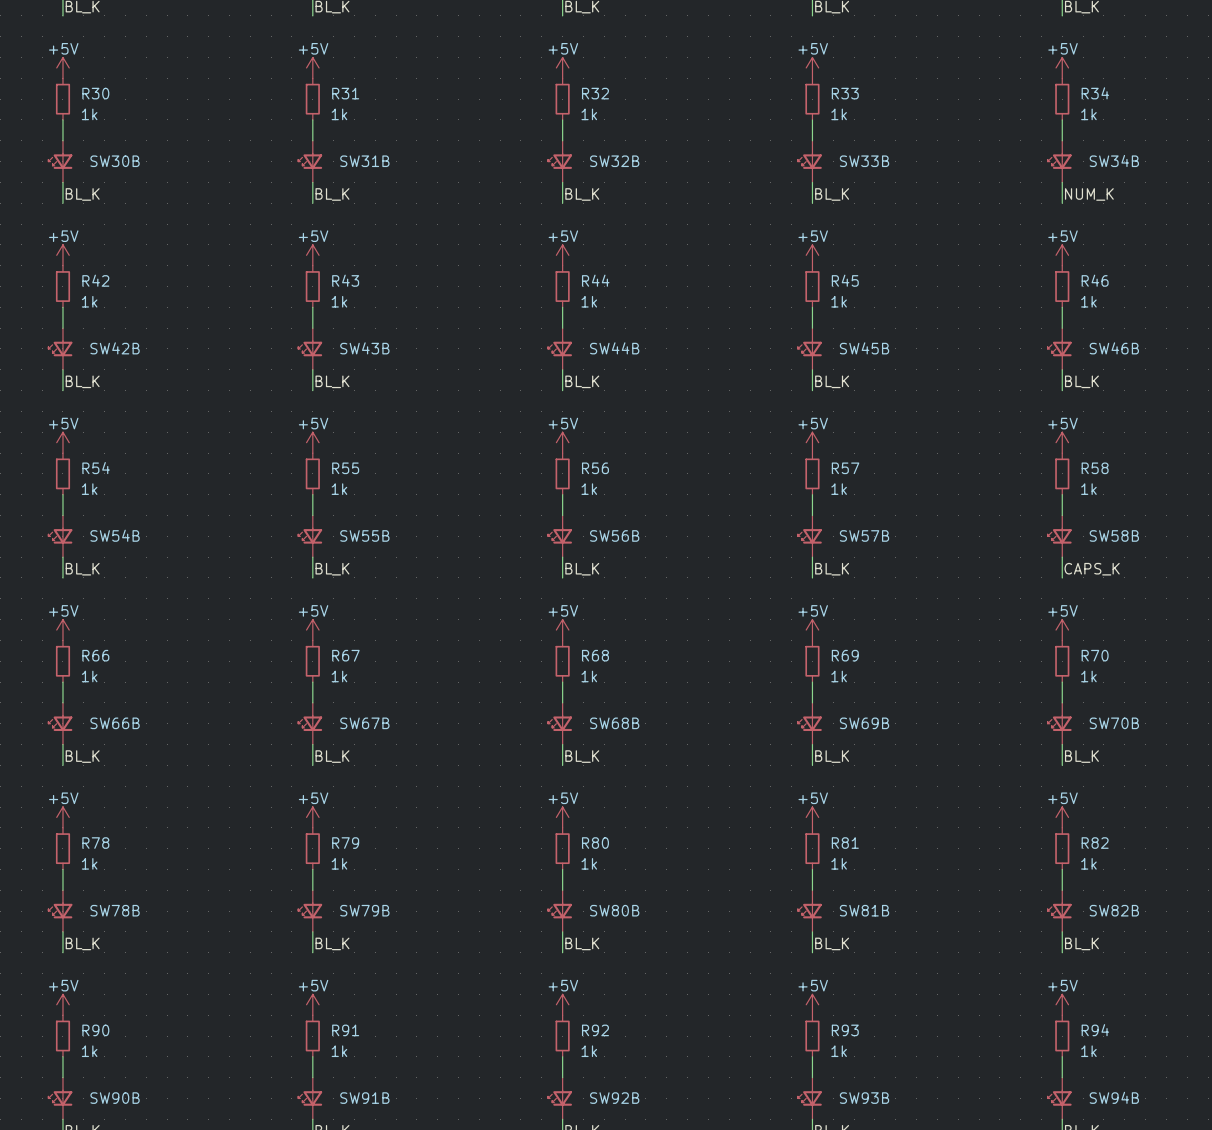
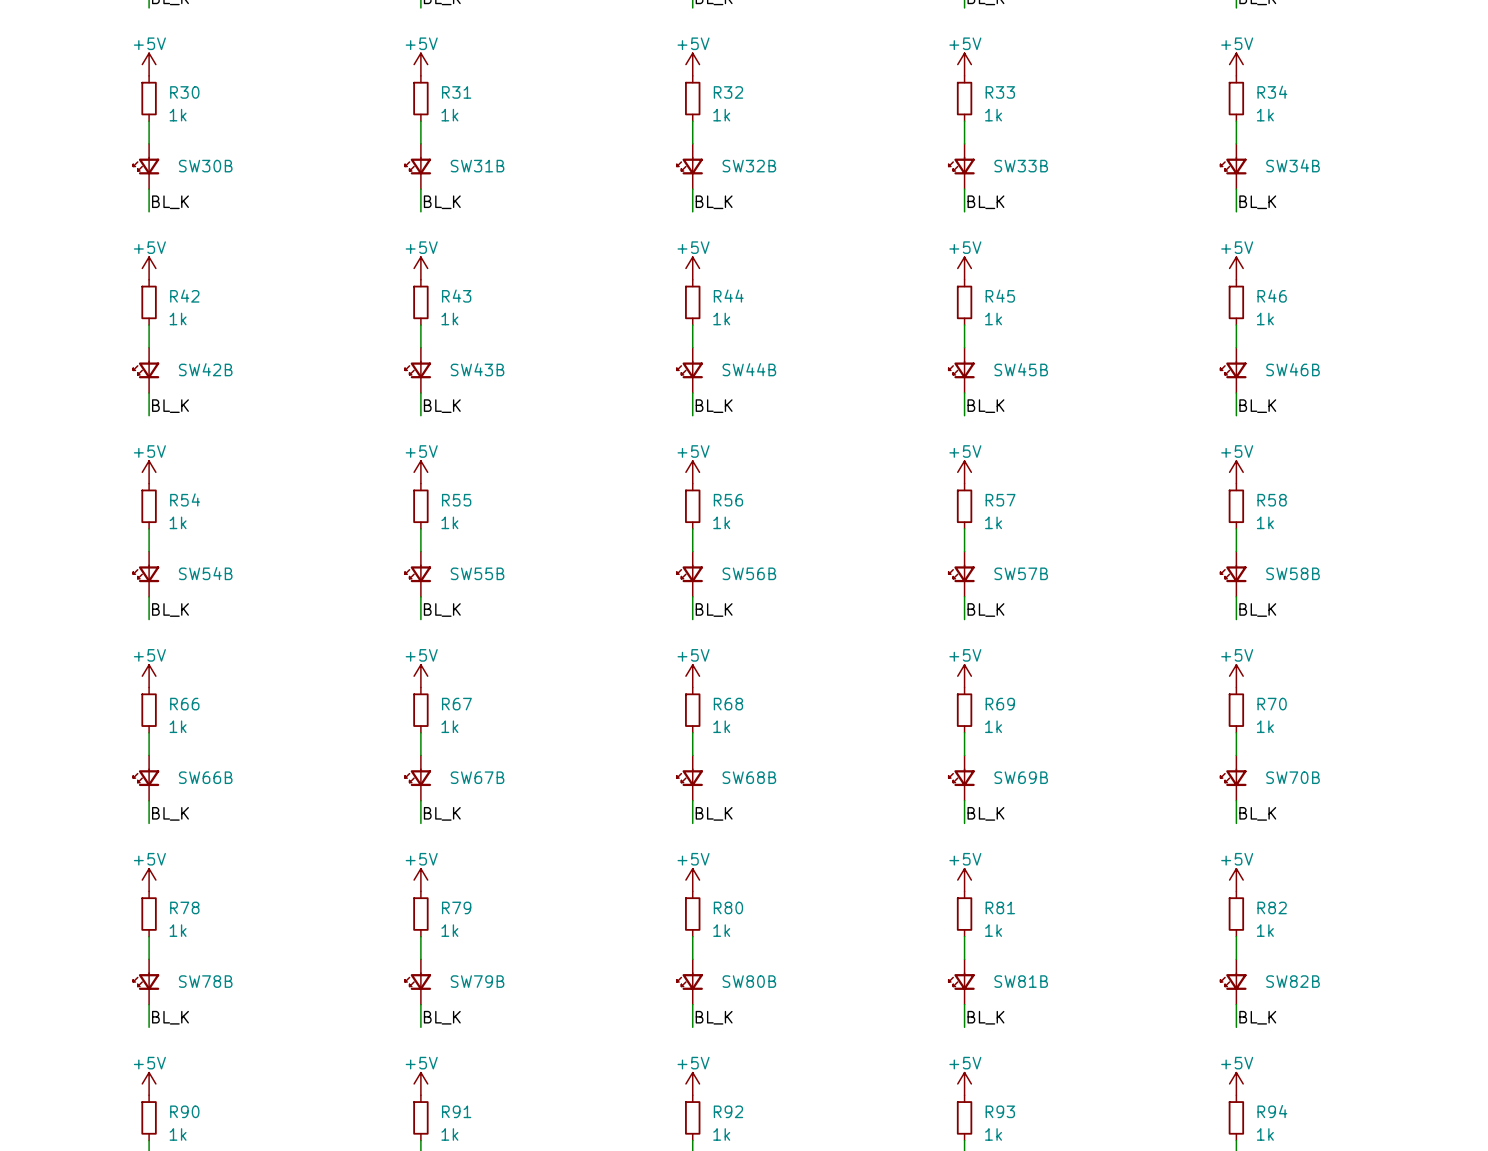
label: NUM_K (1089, 194) -> BL_K (1257, 202)
label: CAPS_K (1092, 569) -> BL_K (1257, 609)

